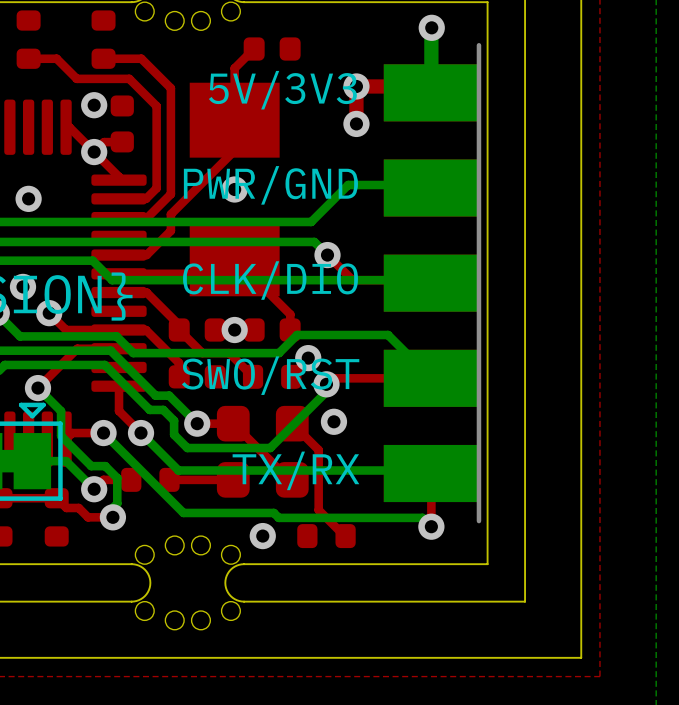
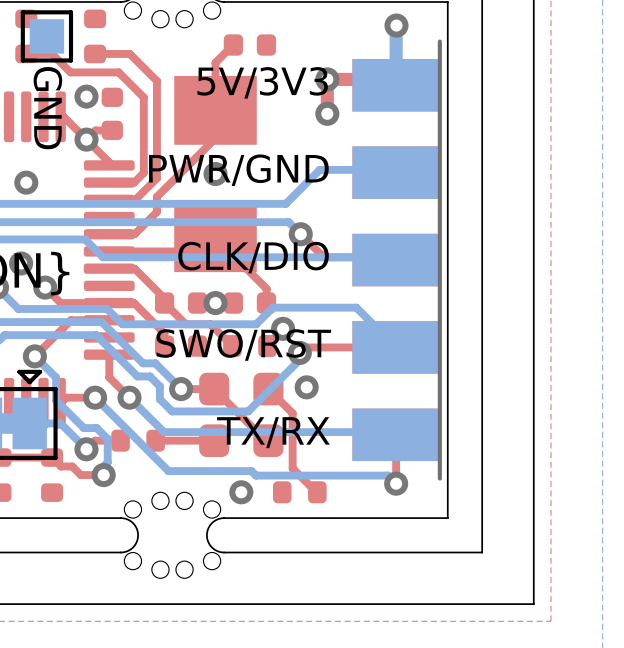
part: none -> (46, 36)
text: none -> GND (47, 108)

